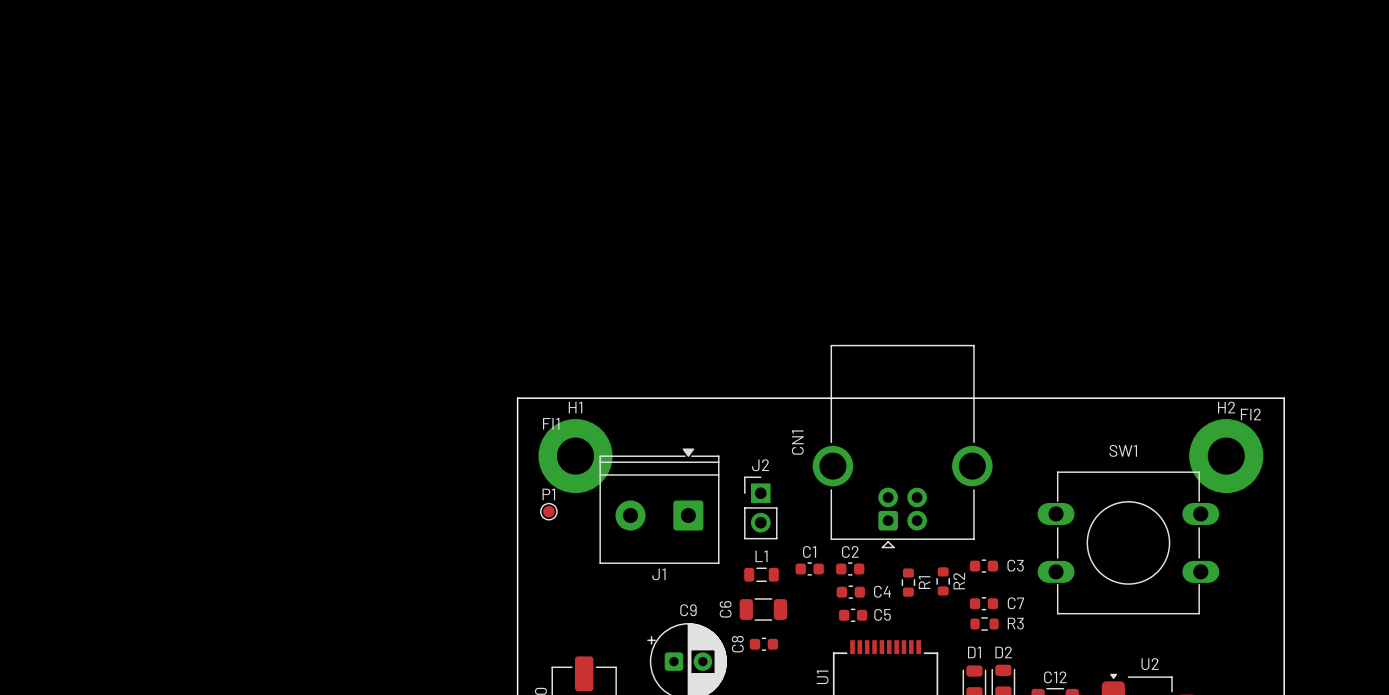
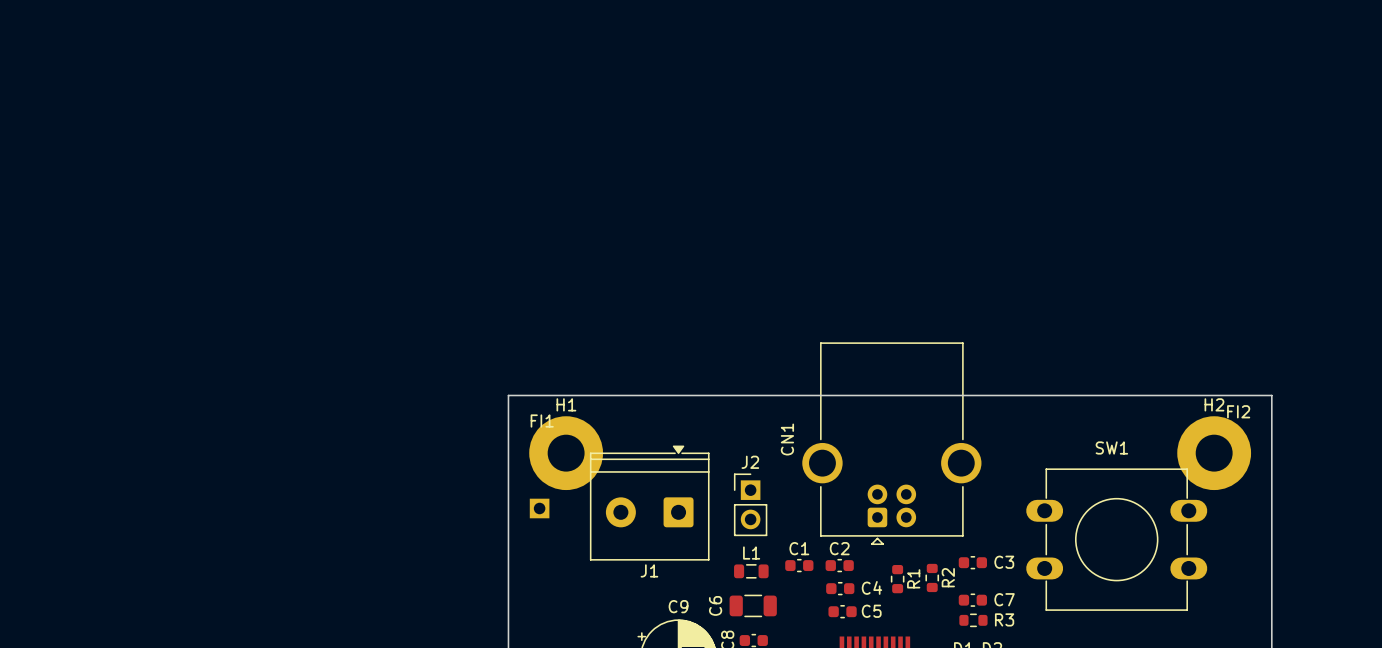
P1: (548, 511) -> none
part: none -> (539, 508)

